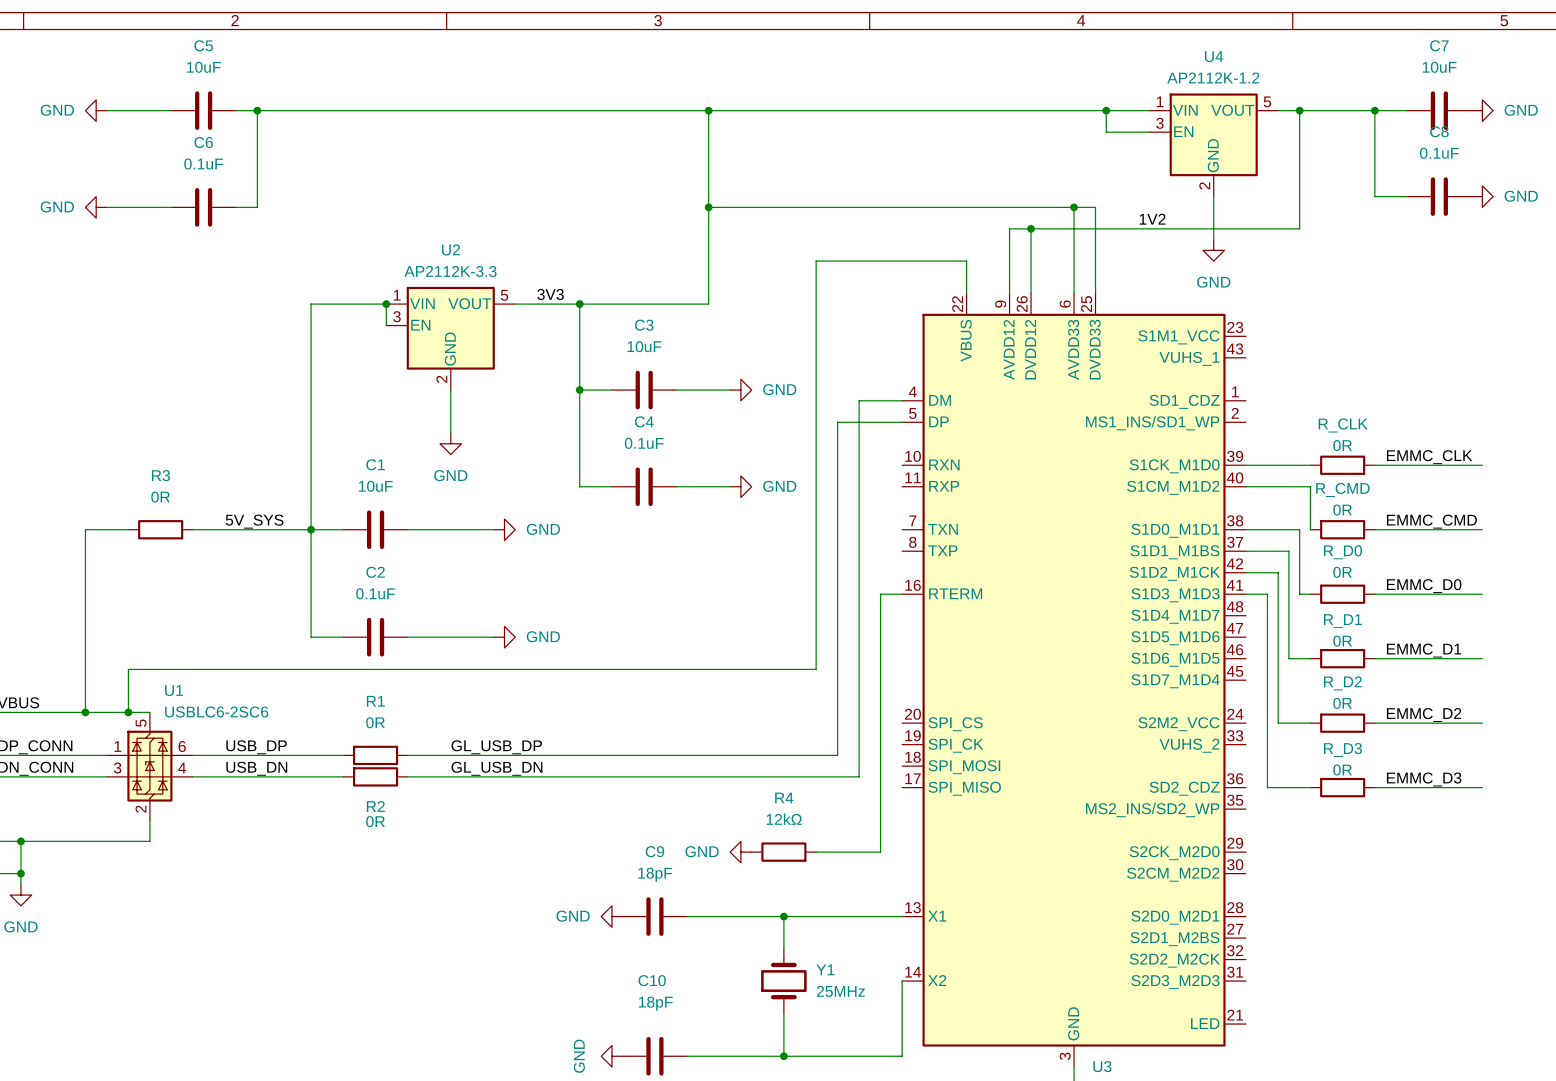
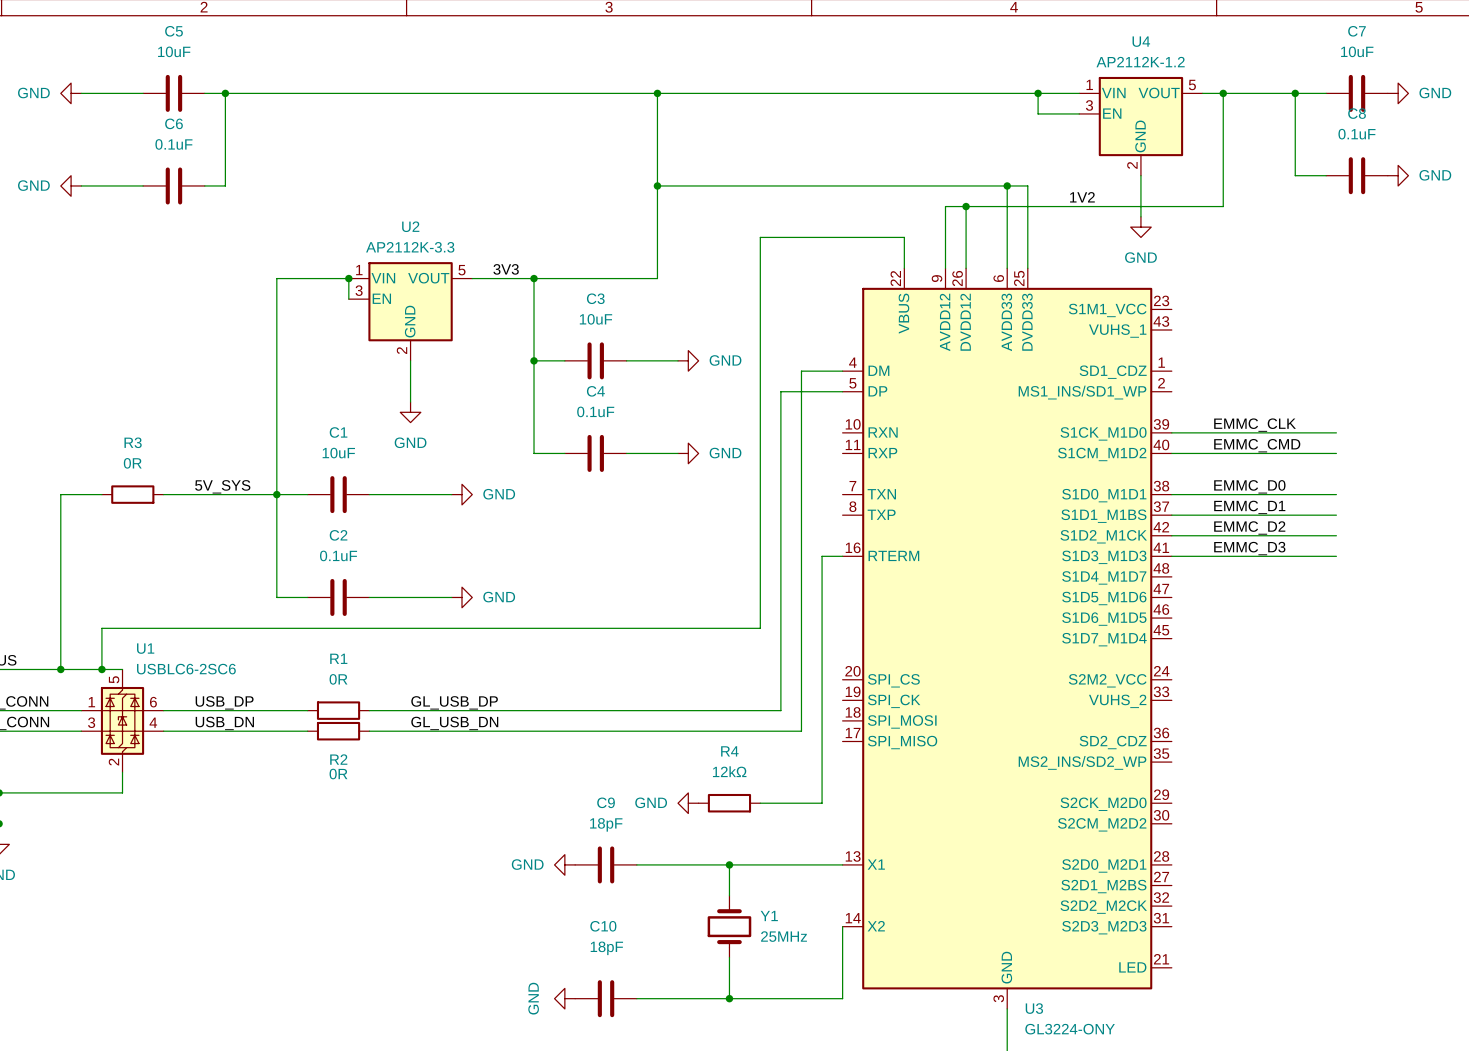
label position: EMMC_CLK (1429, 457) -> EMMC_CLK (1255, 425)
R_CLK: 0R (1342, 465) -> none
wire: (1417, 465) (1482, 465) -> (1233, 432) (1295, 432)
wire: (1310, 486) (1310, 529) -> (1233, 453) (1336, 453)
label position: EMMC_CMD (1431, 521) -> EMMC_CMD (1257, 445)
wire: (1299, 529) (1299, 594) -> (1192, 556) (1223, 556)
wire: none -> (1223, 494) (1295, 494)
R_CMD: 0R (1342, 529) -> none
wire: (1417, 529) (1482, 529) -> none
wire: (1288, 551) (1288, 658) (1310, 658) -> (1212, 515) (1336, 515)
wire: (1278, 572) (1278, 723) (1310, 723) -> (1202, 535) (1336, 535)
label: none -> EMMC_D3 (1249, 548)
label position: EMMC_D0 (1424, 586) -> EMMC_D0 (1249, 486)
wire: (1267, 594) (1267, 787) (1310, 787) -> none
R_D0: 0R (1342, 594) -> none
wire: (1417, 594) (1482, 594) -> (1233, 556) (1295, 556)
label position: EMMC_D1 (1424, 650) -> EMMC_D1 (1249, 507)
R_D1: 0R (1342, 658) -> none
wire: (1374, 658) (1482, 658) -> none
label position: EMMC_D2 (1424, 715) -> EMMC_D2 (1249, 527)
R_D2: 0R (1342, 723) -> none
wire: (1374, 723) (1482, 723) -> none
label: EMMC_D3 (1424, 779) -> none
R_D3: 0R (1342, 787) -> none
wire: (1374, 787) (1482, 787) -> none

